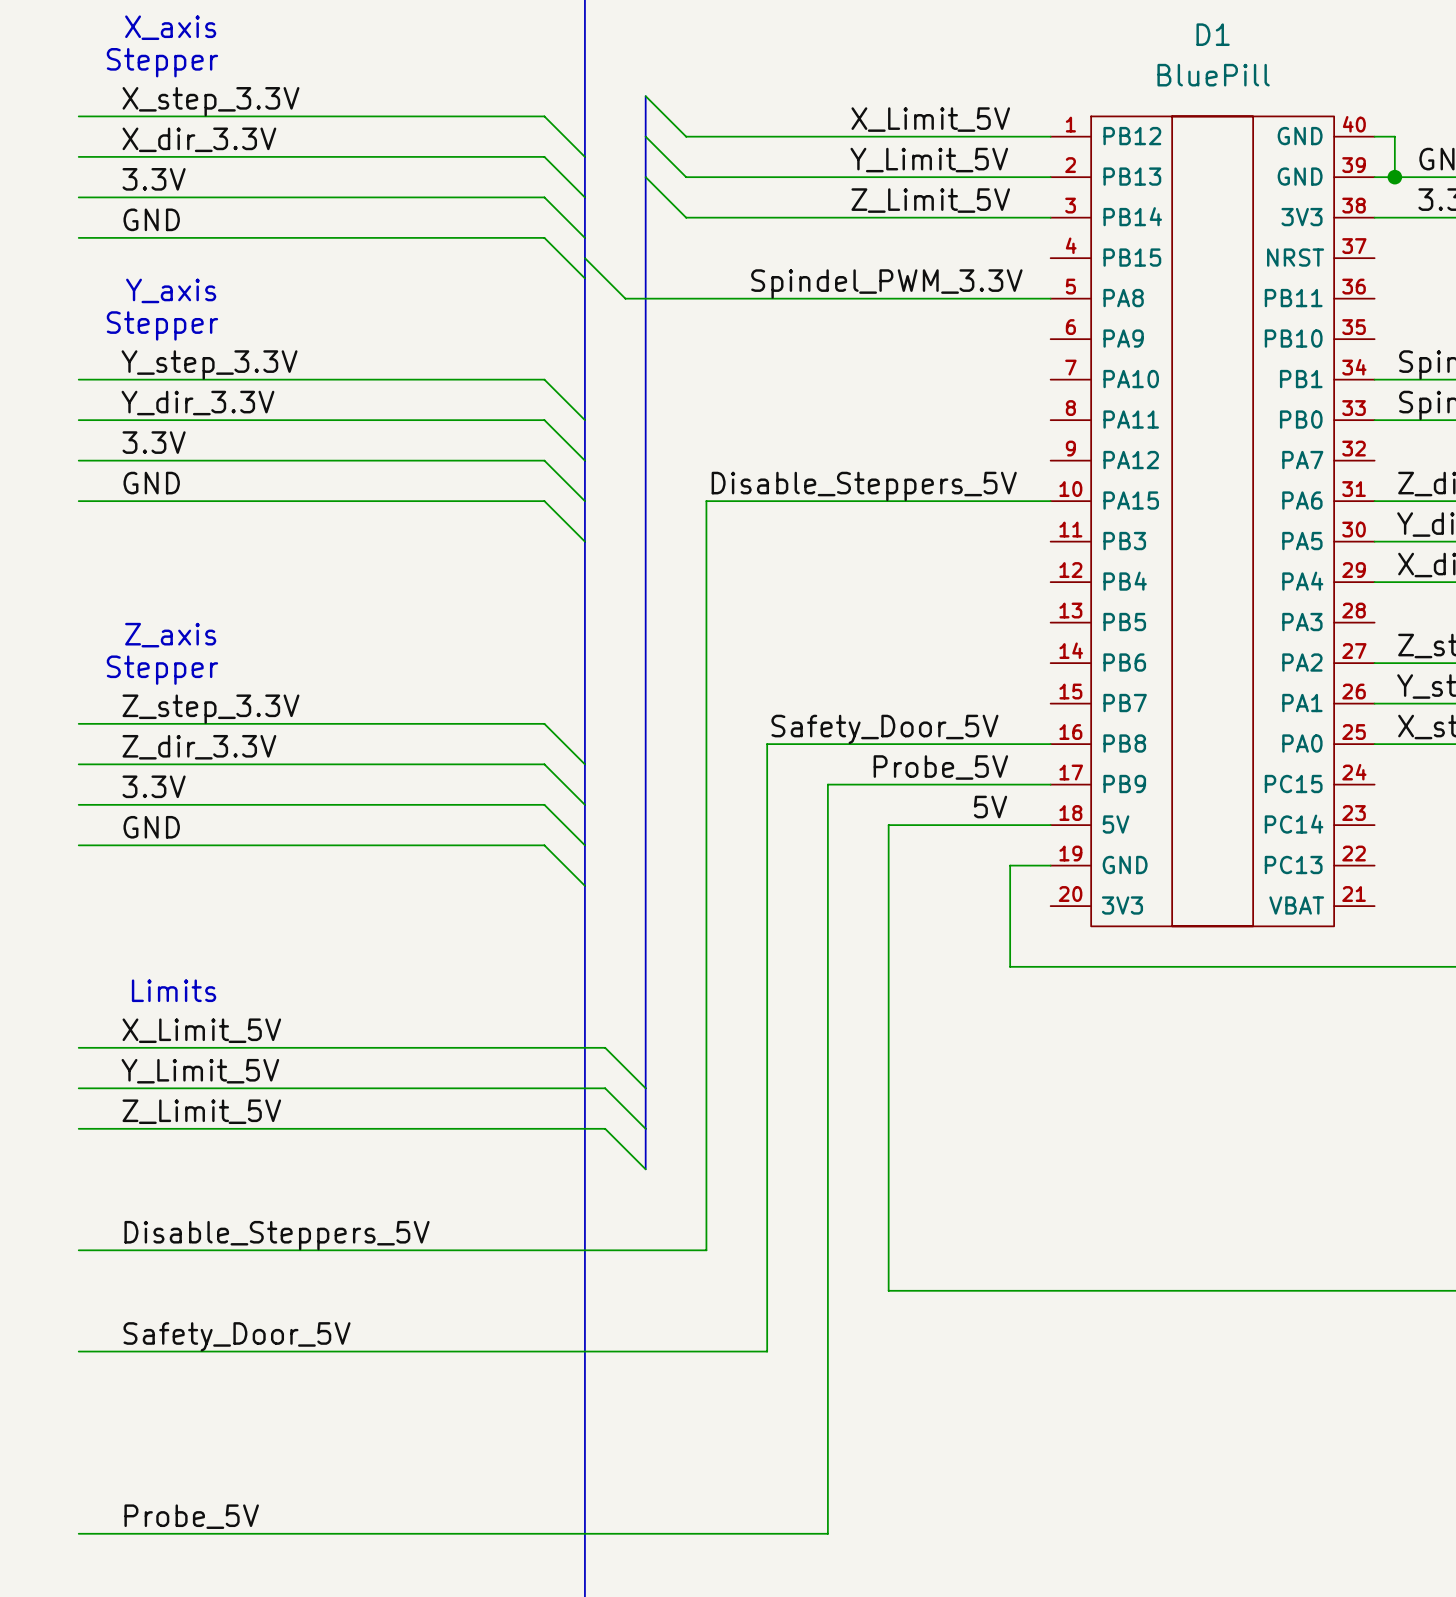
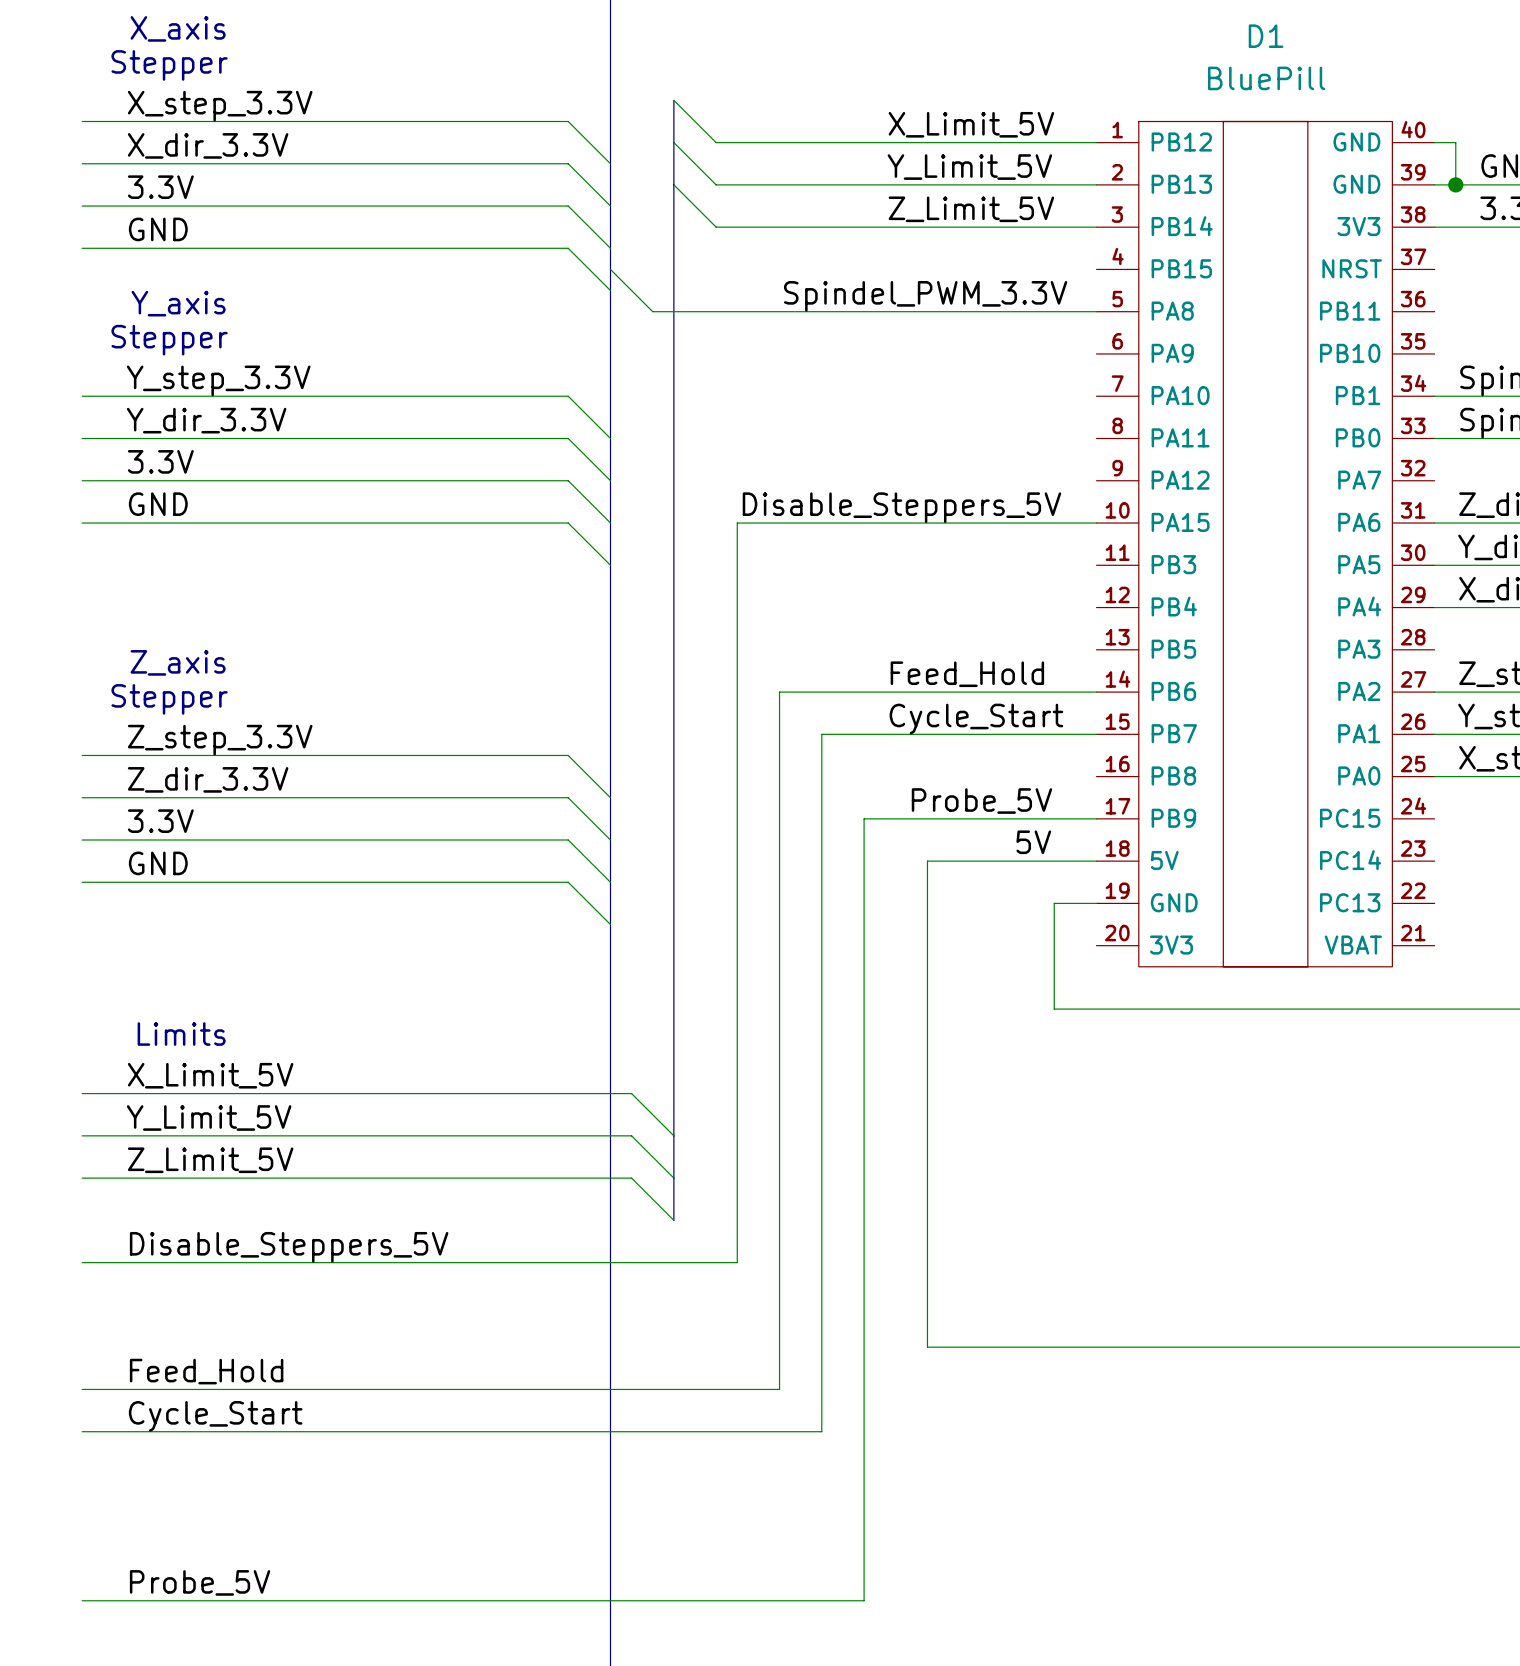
label: none -> Feed_Hold (967, 674)
wire: none -> (1096, 692) (779, 692) (779, 1389) (82, 1389)
label: none -> Cycle_Start (976, 719)
wire: none -> (1096, 734) (821, 734) (821, 1431) (82, 1431)
label: Safety_Door_5V (884, 729) -> none
wire: (1050, 744) (767, 744) (767, 1351) (78, 1351) -> none
wire: (706, 1209) (706, 1250) (78, 1250) -> (737, 1262) (82, 1262)
label position: Disable_Steppers_5V (277, 1235) -> Disable_Steppers_5V (289, 1247)
label: none -> Feed_Hold (206, 1371)
label: Safety_Door_5V (237, 1336) -> none
label: none -> Cycle_Start (215, 1416)

